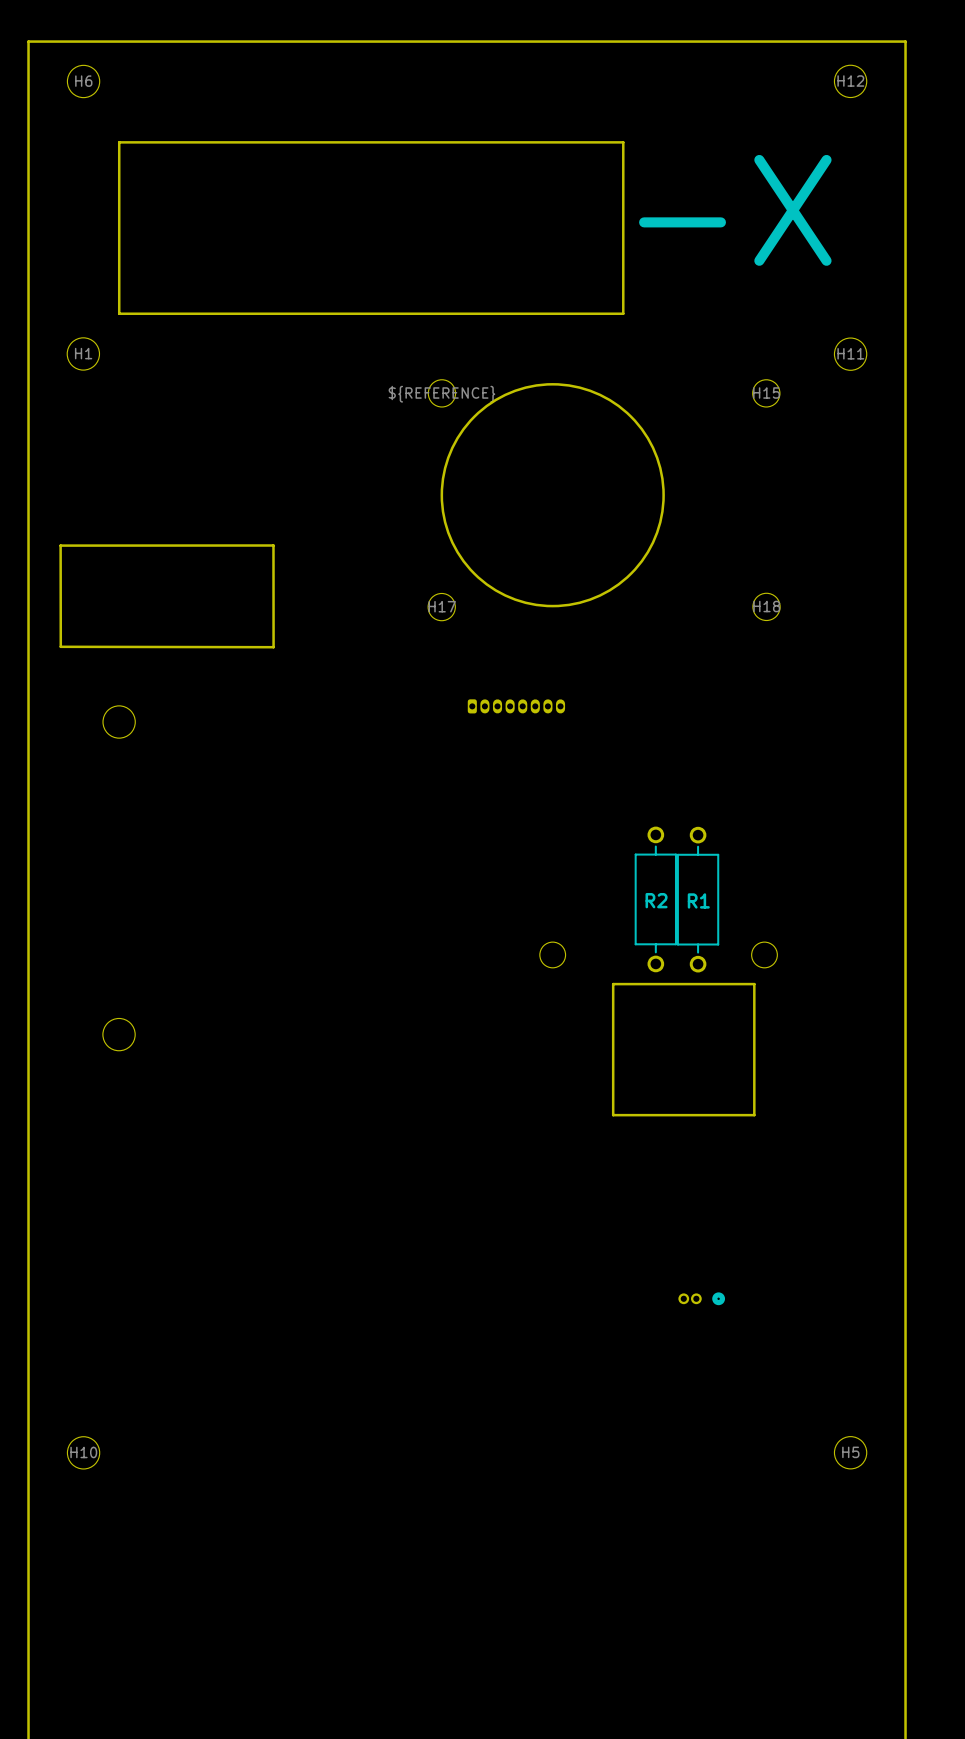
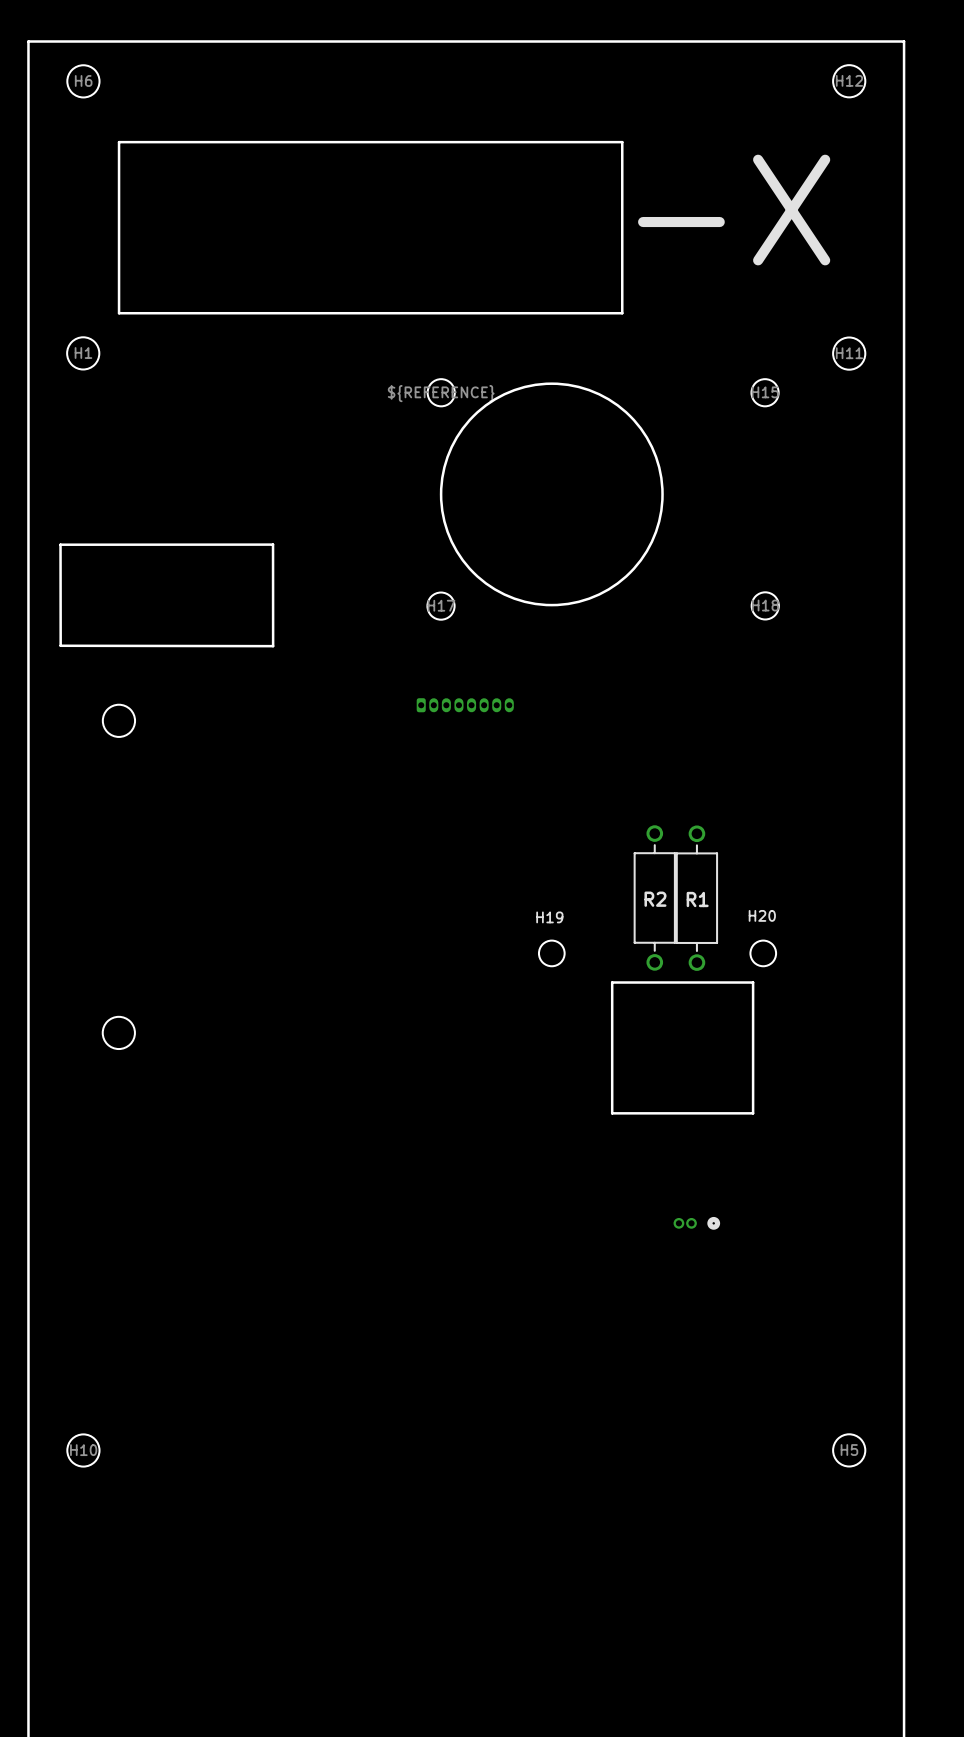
part position: (516, 706) -> (465, 705)
H20 name: none -> H20 (762, 915)
H19 name: none -> H19 (549, 917)
part position: (701, 1298) -> (696, 1223)

